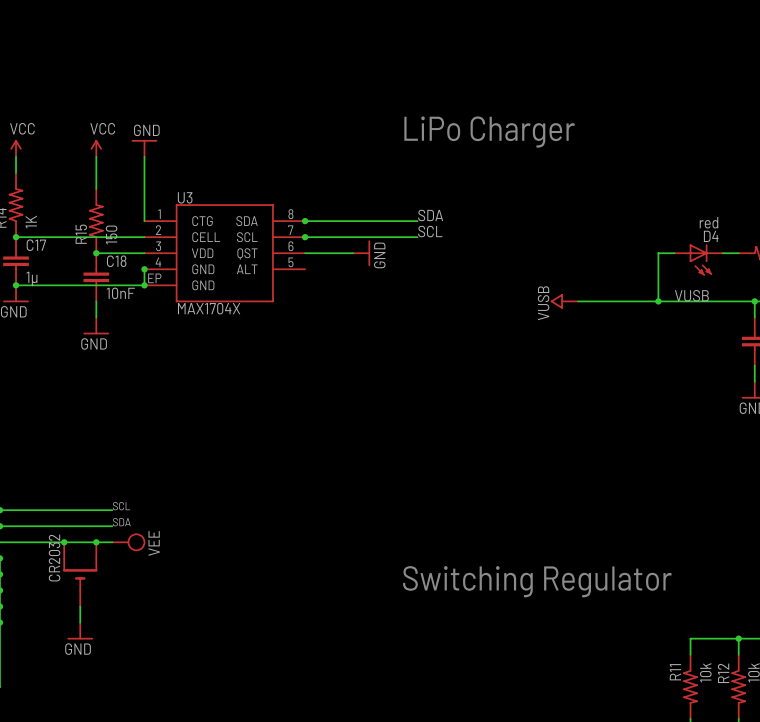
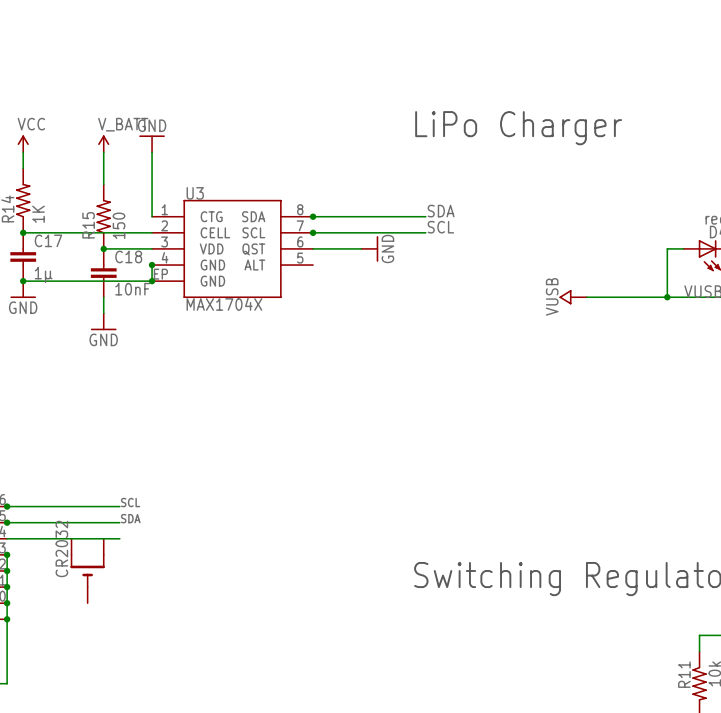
power symbol: VCC (96, 148) -> V_BATT (103, 143)
junction: (64, 542) -> none
junction: (96, 542) -> none
power symbol: VEE (128, 542) -> none
wire: (80, 606) (80, 622) -> none
power symbol: GND (80, 631) -> none

